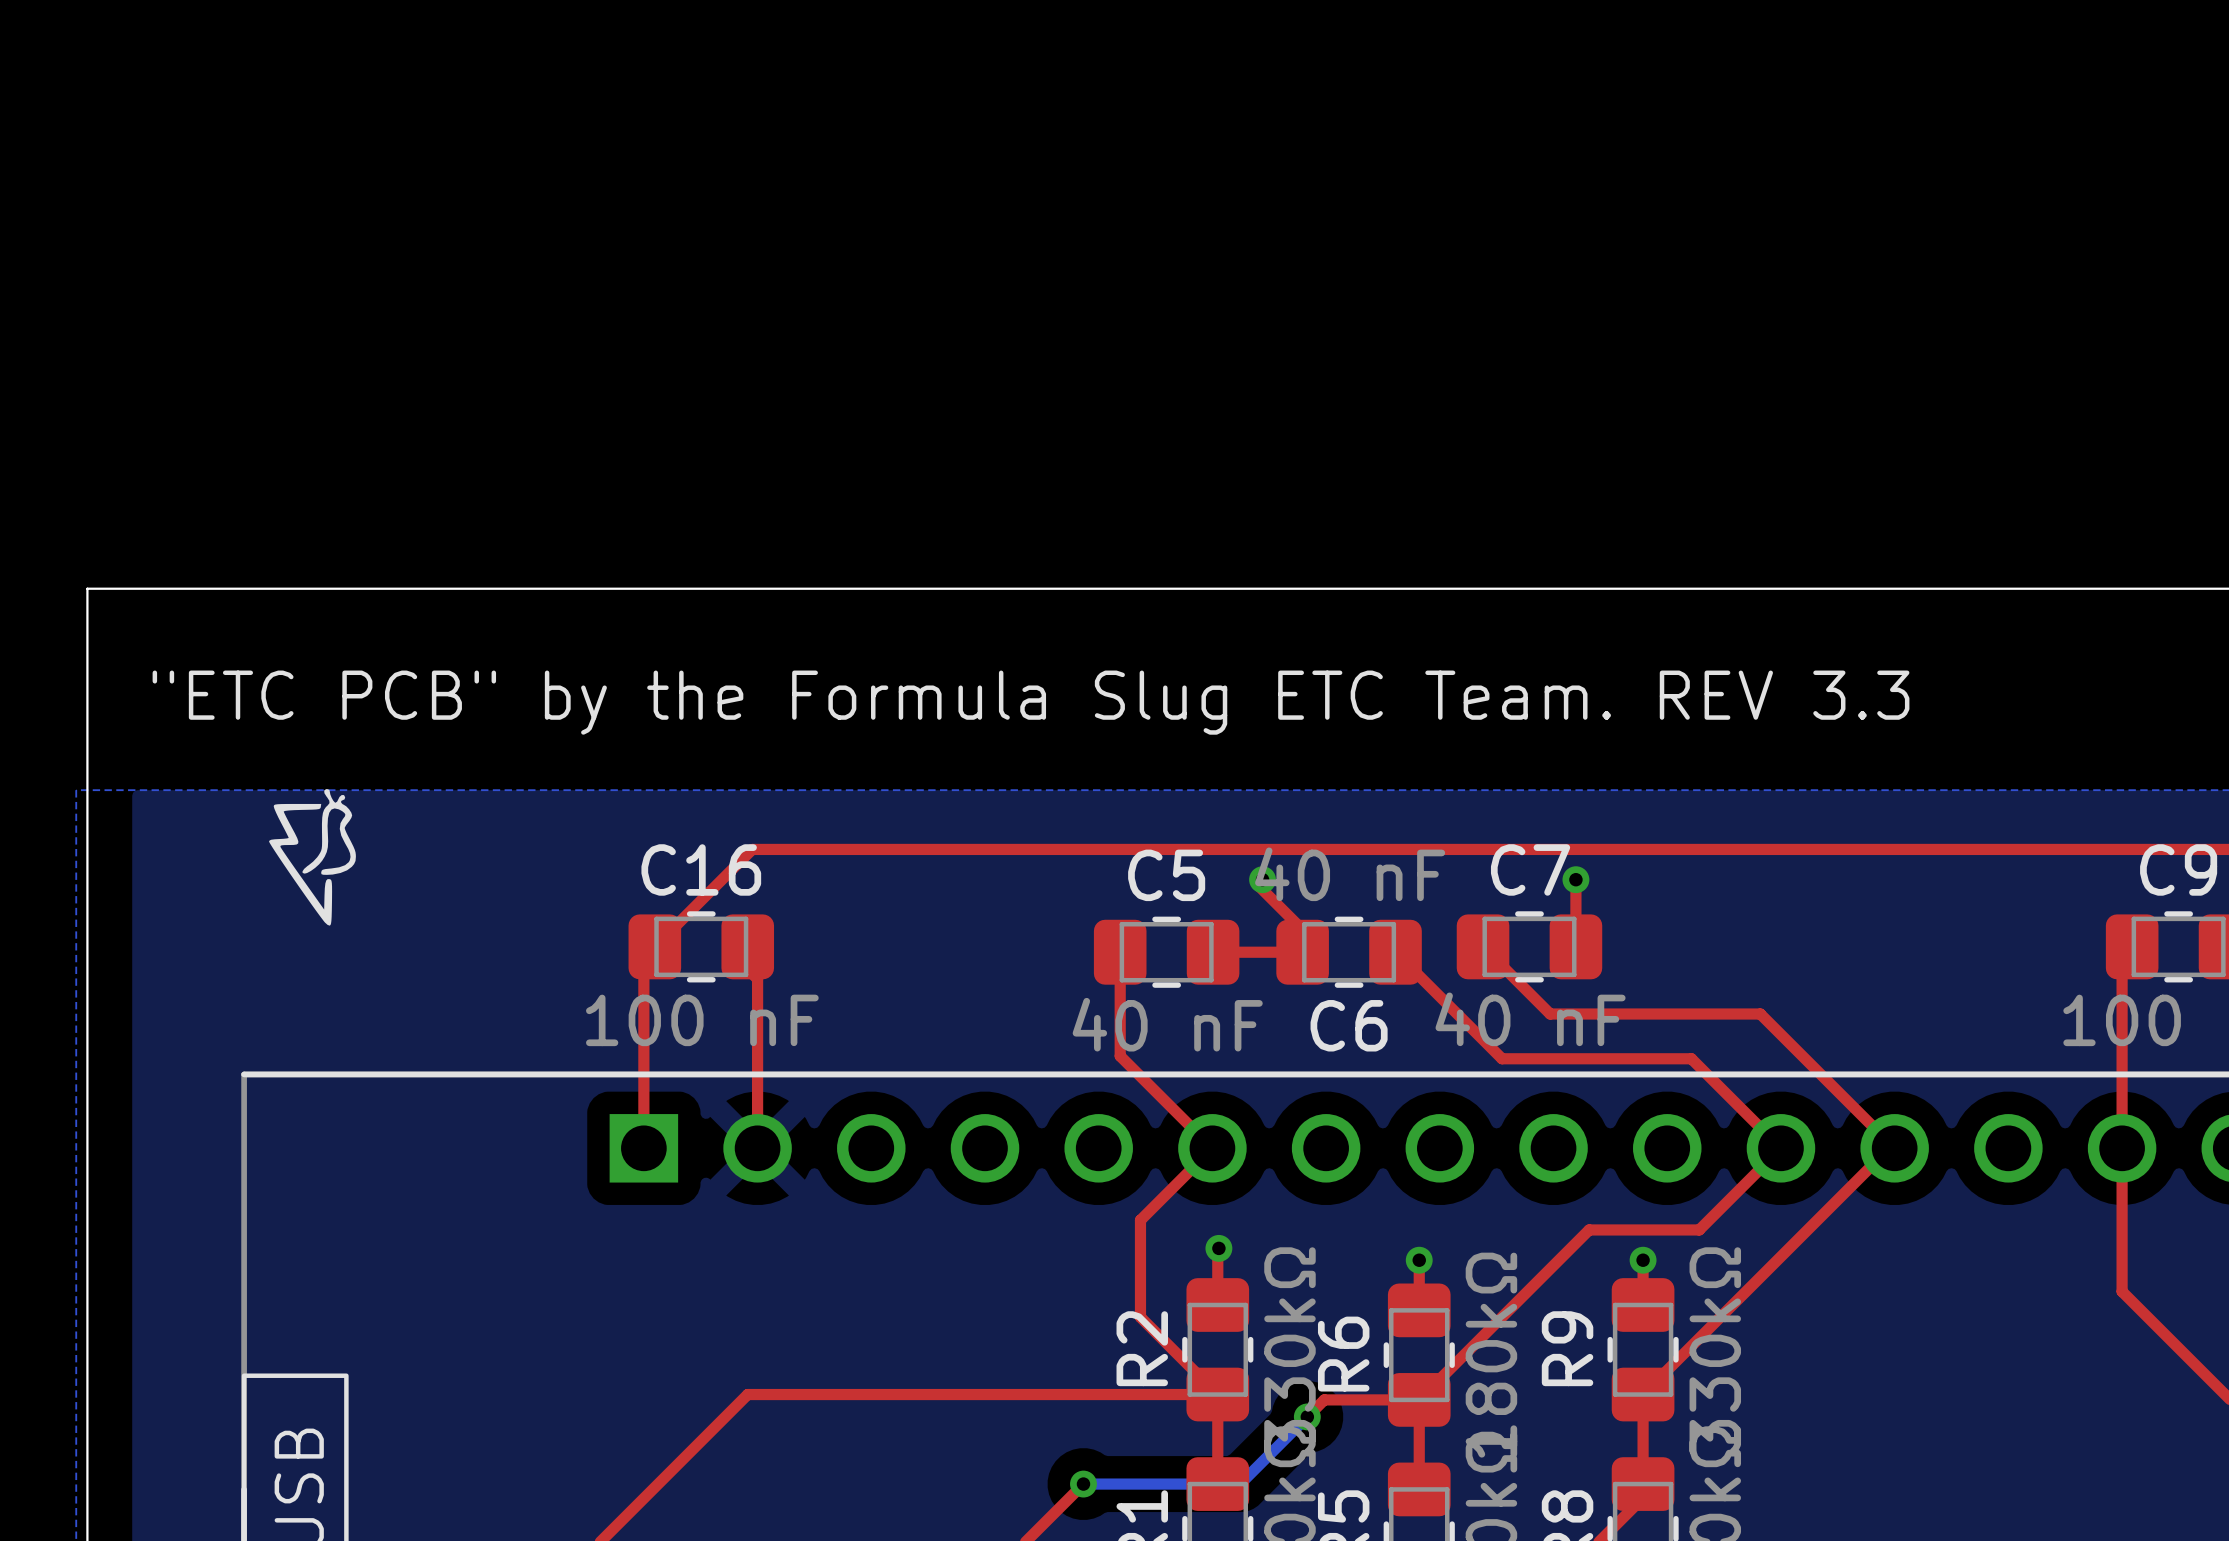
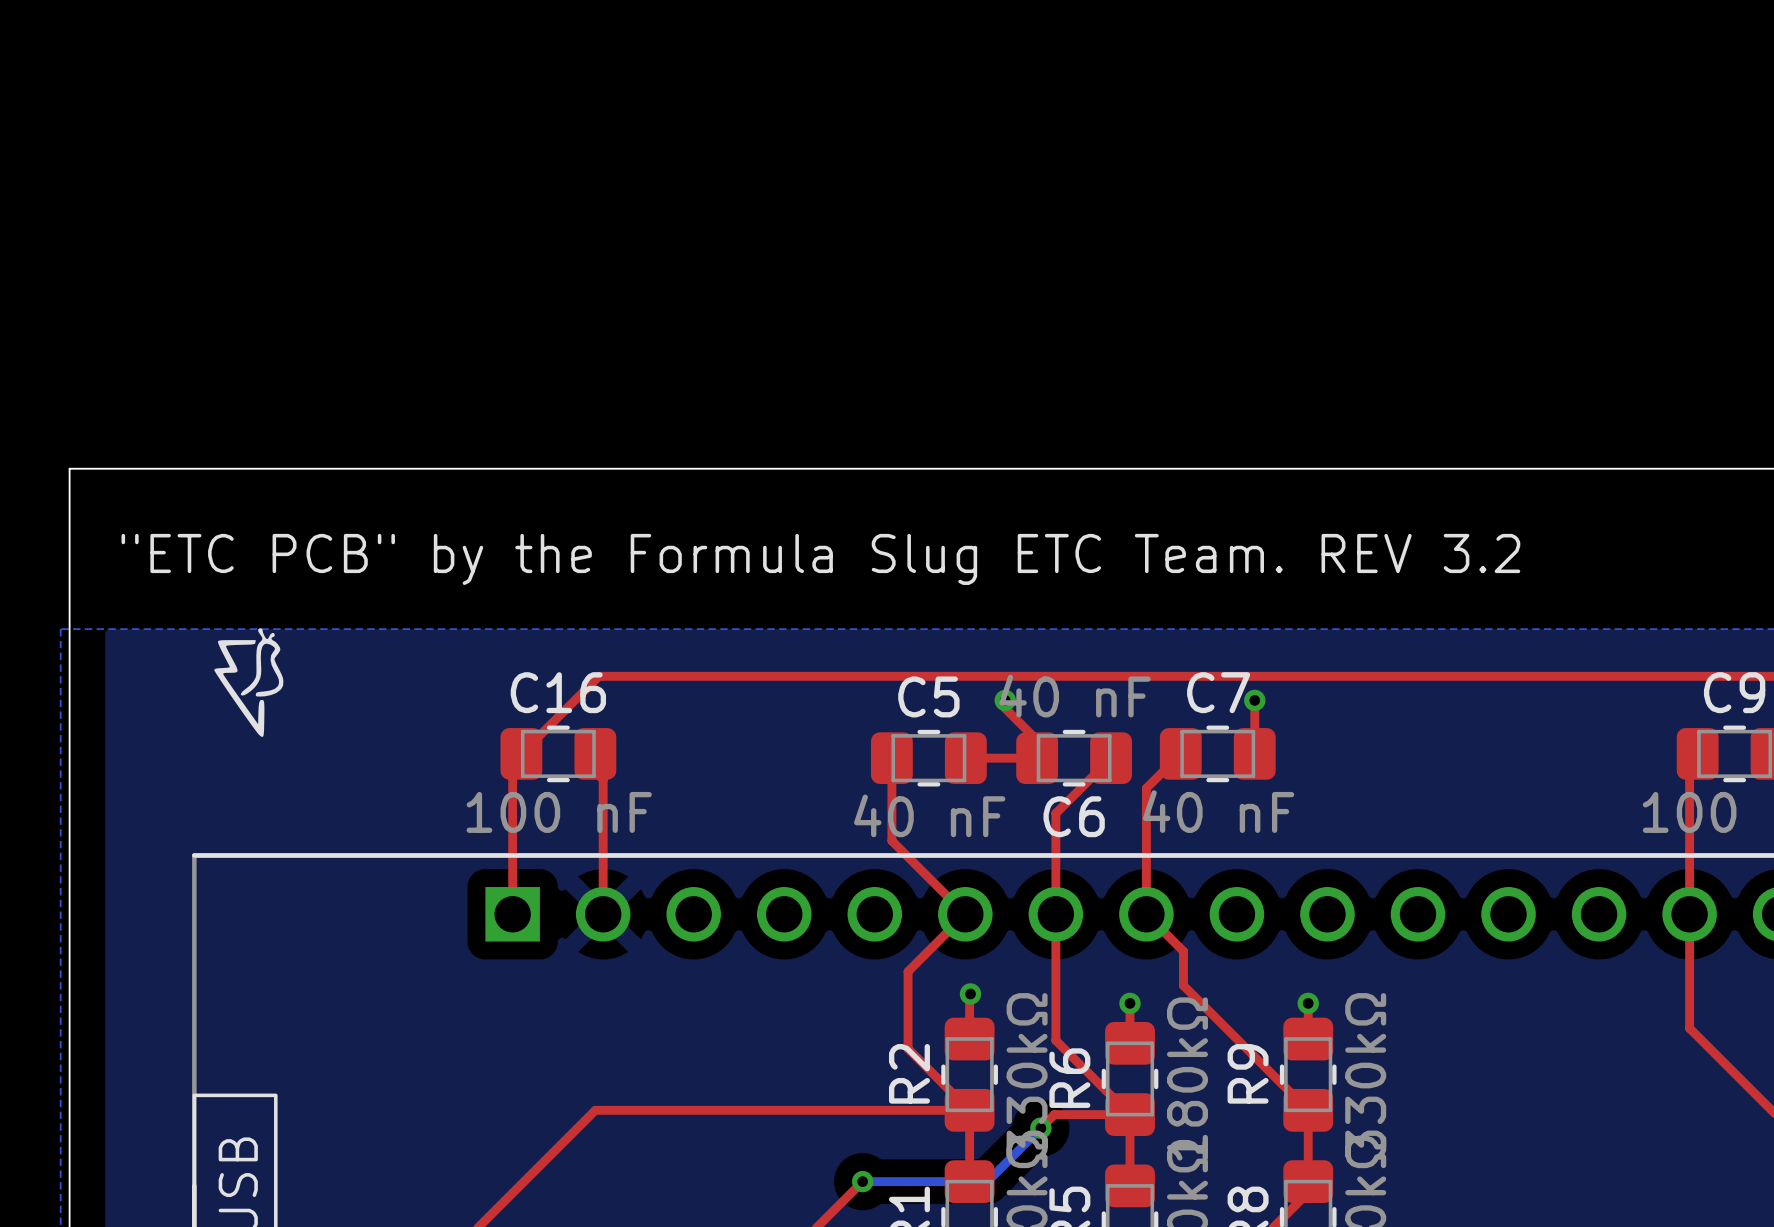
text: "ETC PCB" by the Formula Slug ETC Team. REV 3.3 (1031, 702) -> "ETC PCB" by the Formula Slug ETC Team. REV 3.2 (820, 559)
top track: (1483, 946) (1550, 1014) (1760, 1014) (1894, 1148) (1889, 1148) (1643, 1394) -> (1180, 753) (1146, 788) (1146, 914) (1183, 951) (1183, 985) (1308, 1110)
top track: (1395, 952) (1502, 1058) (1691, 1058) (1780, 1148) (1699, 1229) (1589, 1229) (1419, 1399) -> (1111, 758) (1055, 813) (1055, 1040) (1130, 1114)

